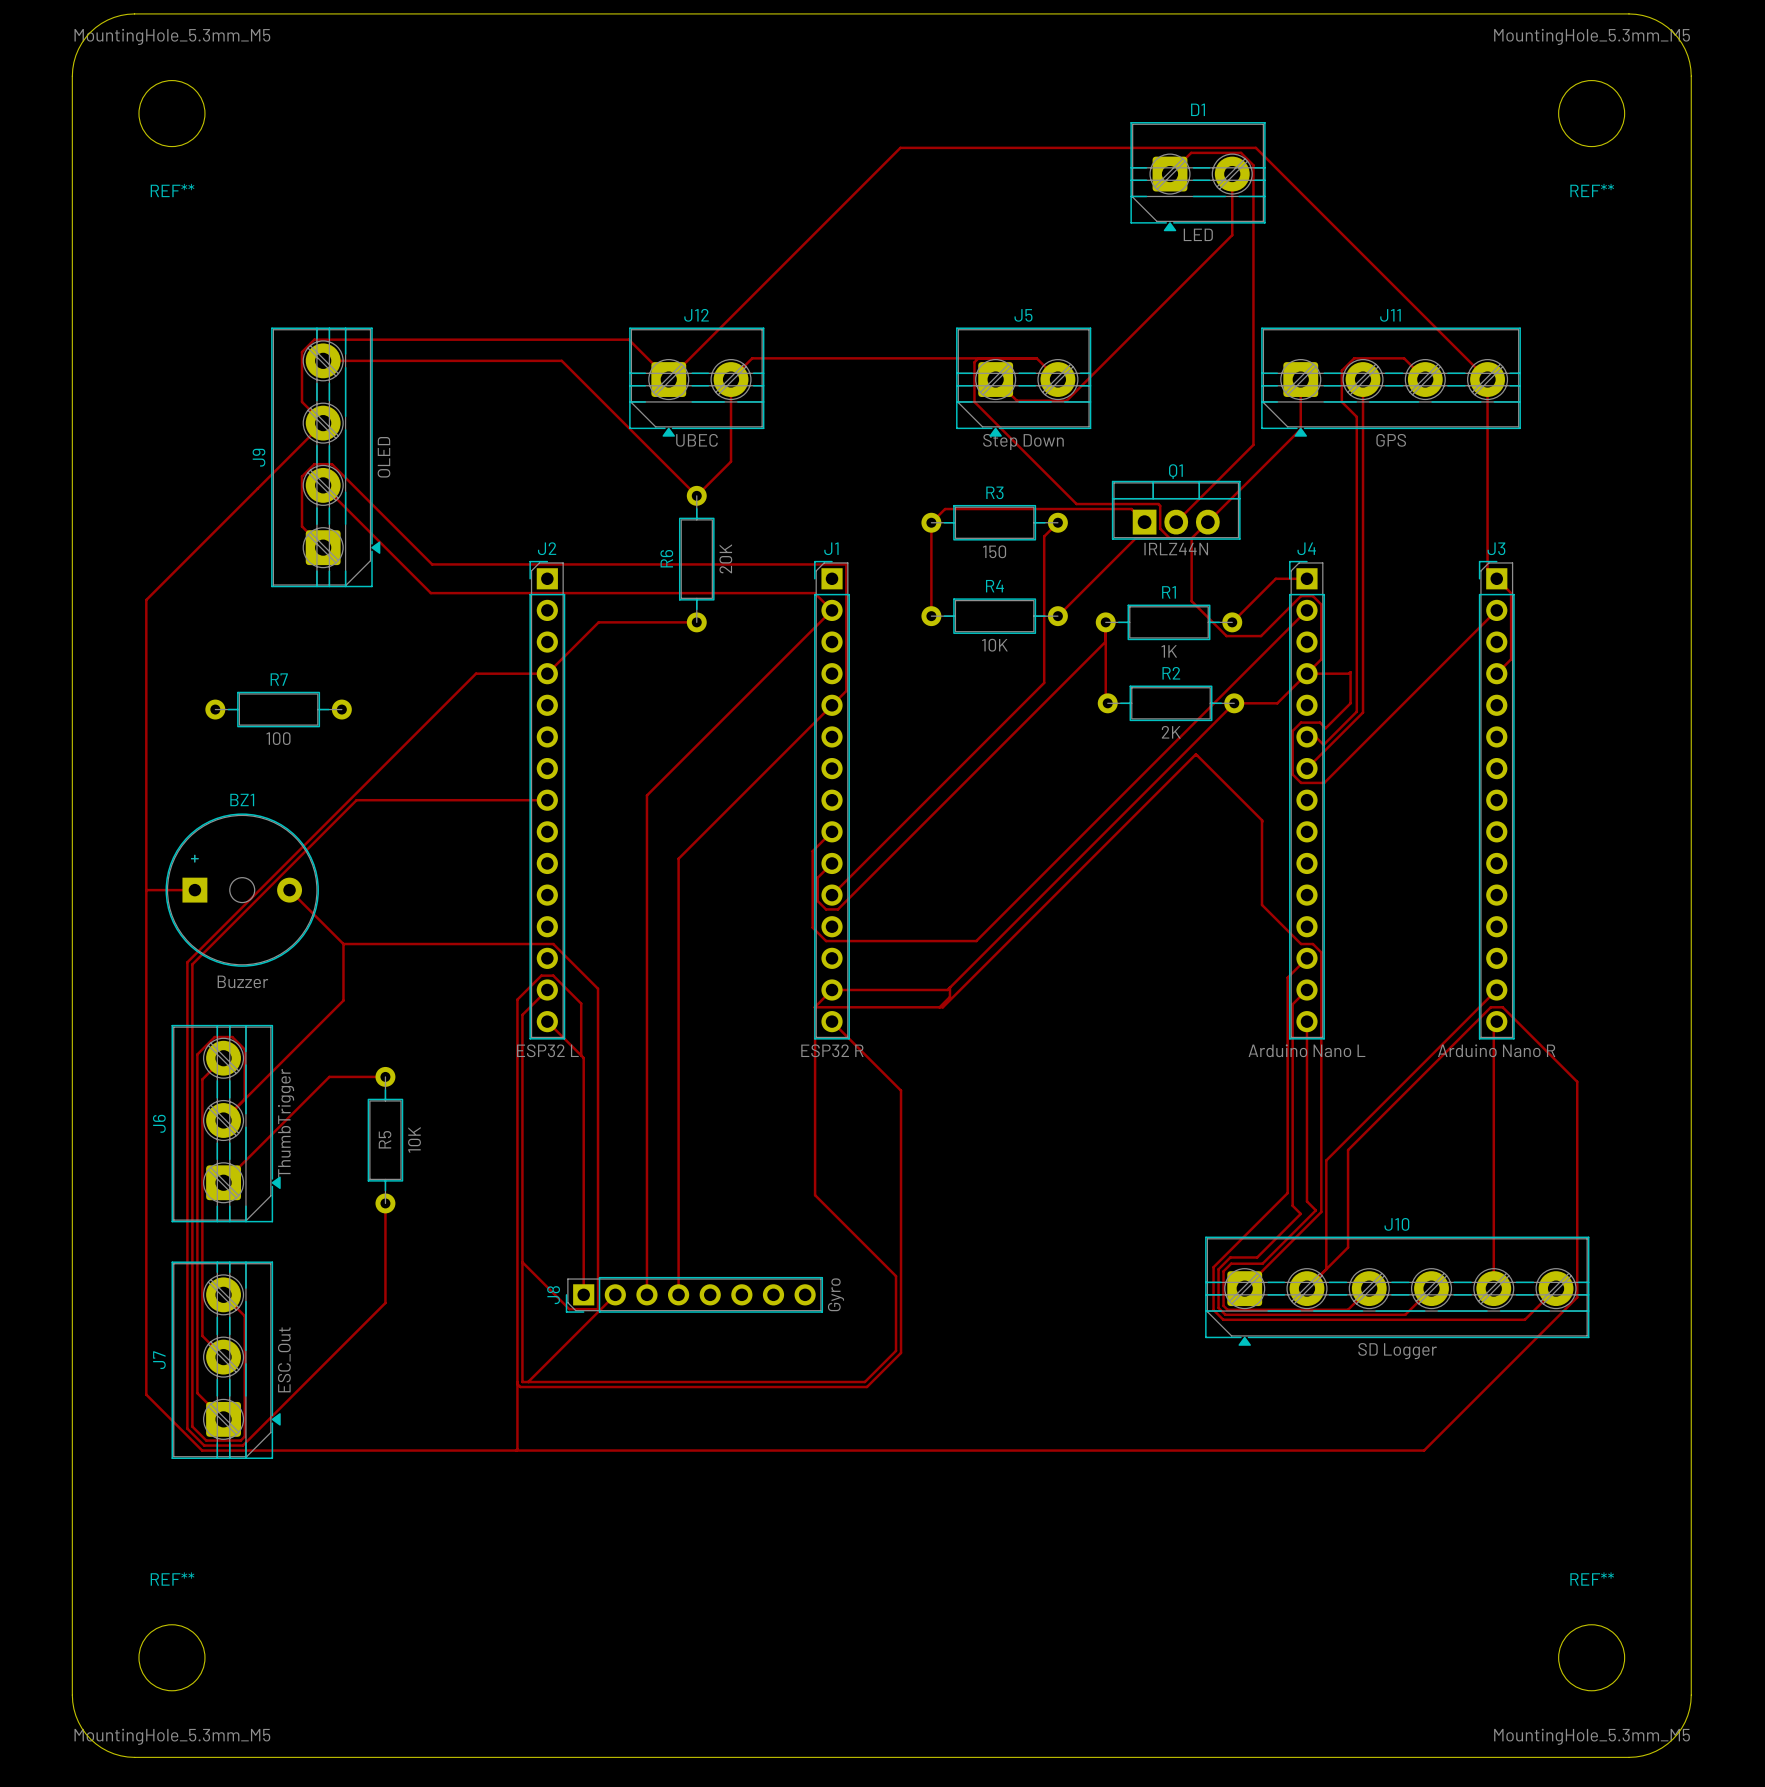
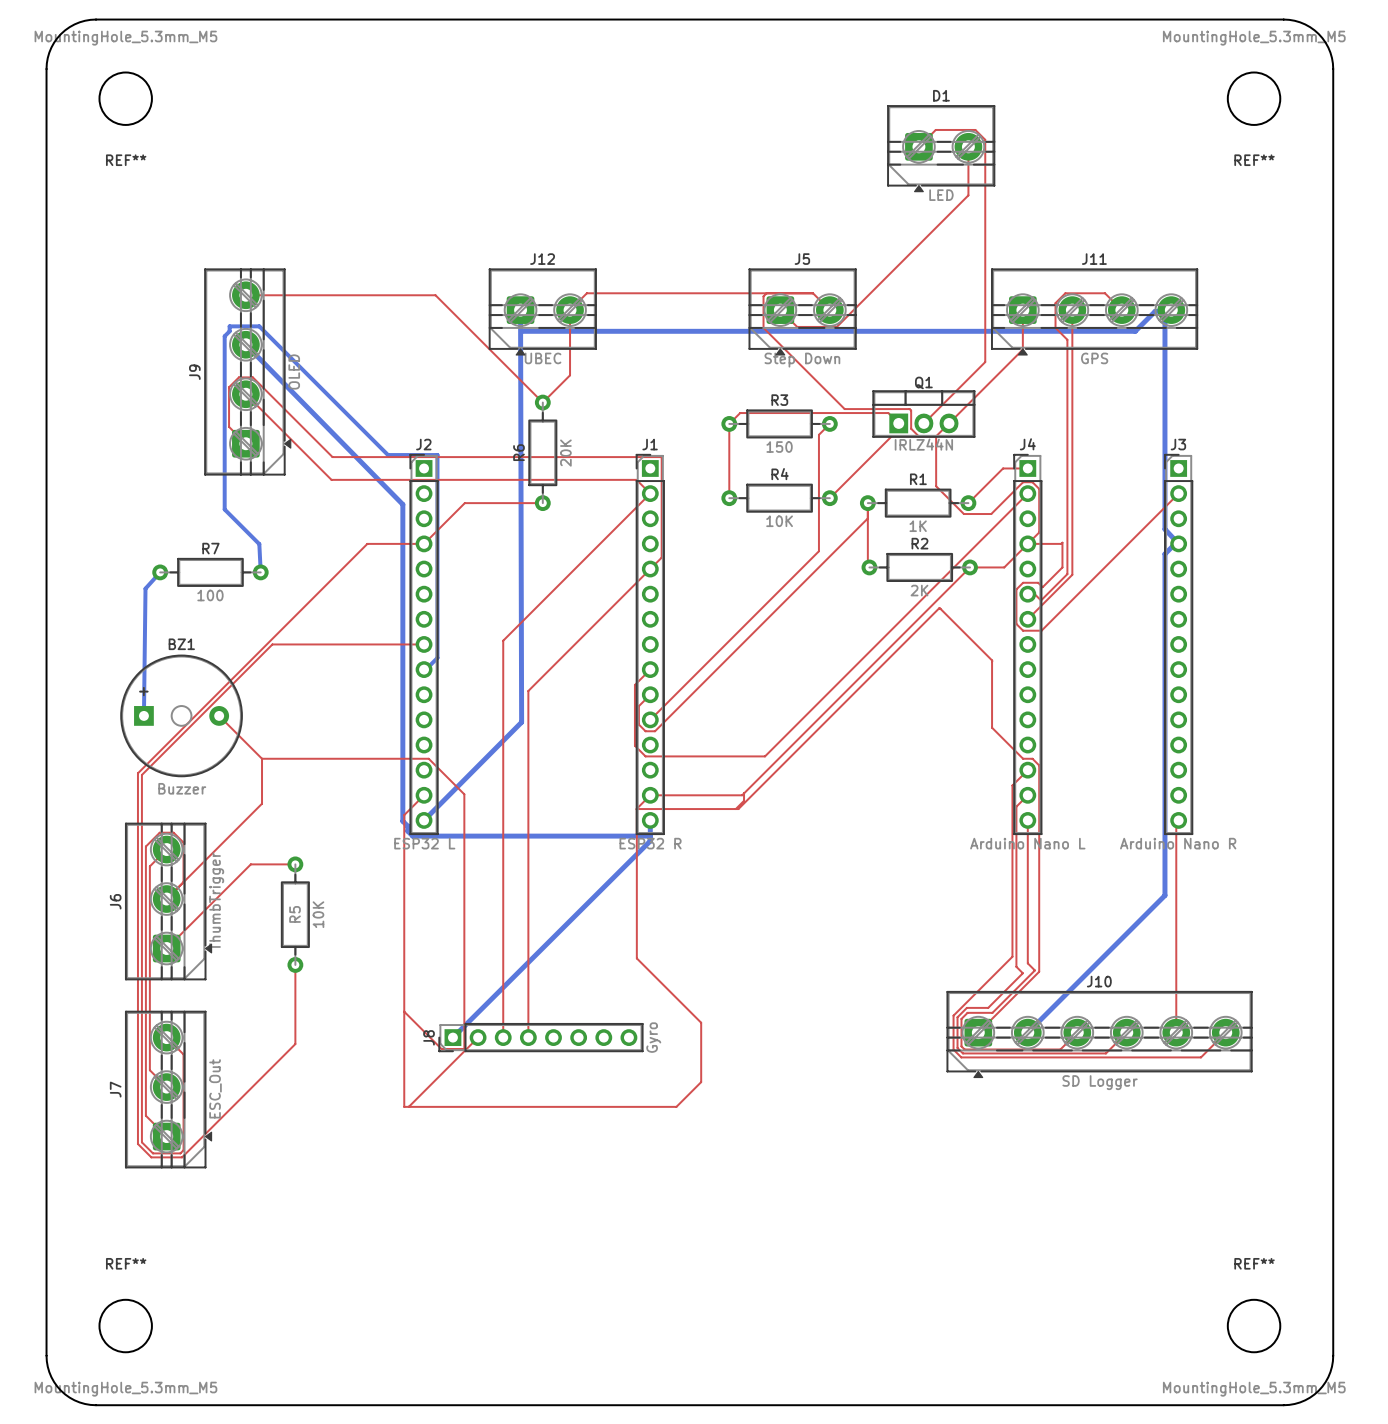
bottom track: none -> (520, 310) (521, 722) (424, 820)
top track: (1487, 379) (1487, 569) (1511, 593) (1511, 659) (1496, 673) -> none
bottom track: none -> (1171, 310) (1155, 311) (1135, 331) (521, 331)
bottom track: none -> (1164, 311) (1164, 529) (1178, 543)
top track: (1496, 388) (1255, 147) (900, 147) (668, 379) (628, 339) (314, 339) (302, 352) (302, 401) (323, 423) (146, 599) (146, 1394) (202, 1450) (1424, 1450) (1577, 1297) (1577, 1081) (1502, 1007) (1490, 1007) (1348, 1150) (1348, 1247) (1306, 1288) -> none
bottom track: none -> (245, 344) (402, 504) (402, 821) (407, 826) (407, 831) (412, 836) (650, 836)
bottom track: none -> (1174, 539) (1174, 544) (1164, 554) (1164, 895) (1027, 1032)
bottom track: none -> (160, 572) (145, 588) (143, 715)
bottom track: none -> (260, 572) (259, 544) (224, 509) (224, 336) (229, 331) (229, 326) (259, 326) (388, 455) (437, 455) (437, 657) (424, 669)
top track: (146, 890) (194, 890) -> none
top track: (1496, 989) (1326, 1160) (1326, 1269) -> none
top track: (547, 1021) (583, 1057) (583, 1294) -> none
top track: (832, 1021) (901, 1090) (901, 1352) (866, 1387) (520, 1387) (517, 1384) -> none
bottom track: none -> (650, 820) (650, 841) (452, 1037)
top track: (581, 1055) (581, 1003) (553, 975) (541, 975) (517, 999) (516, 1450) -> none

